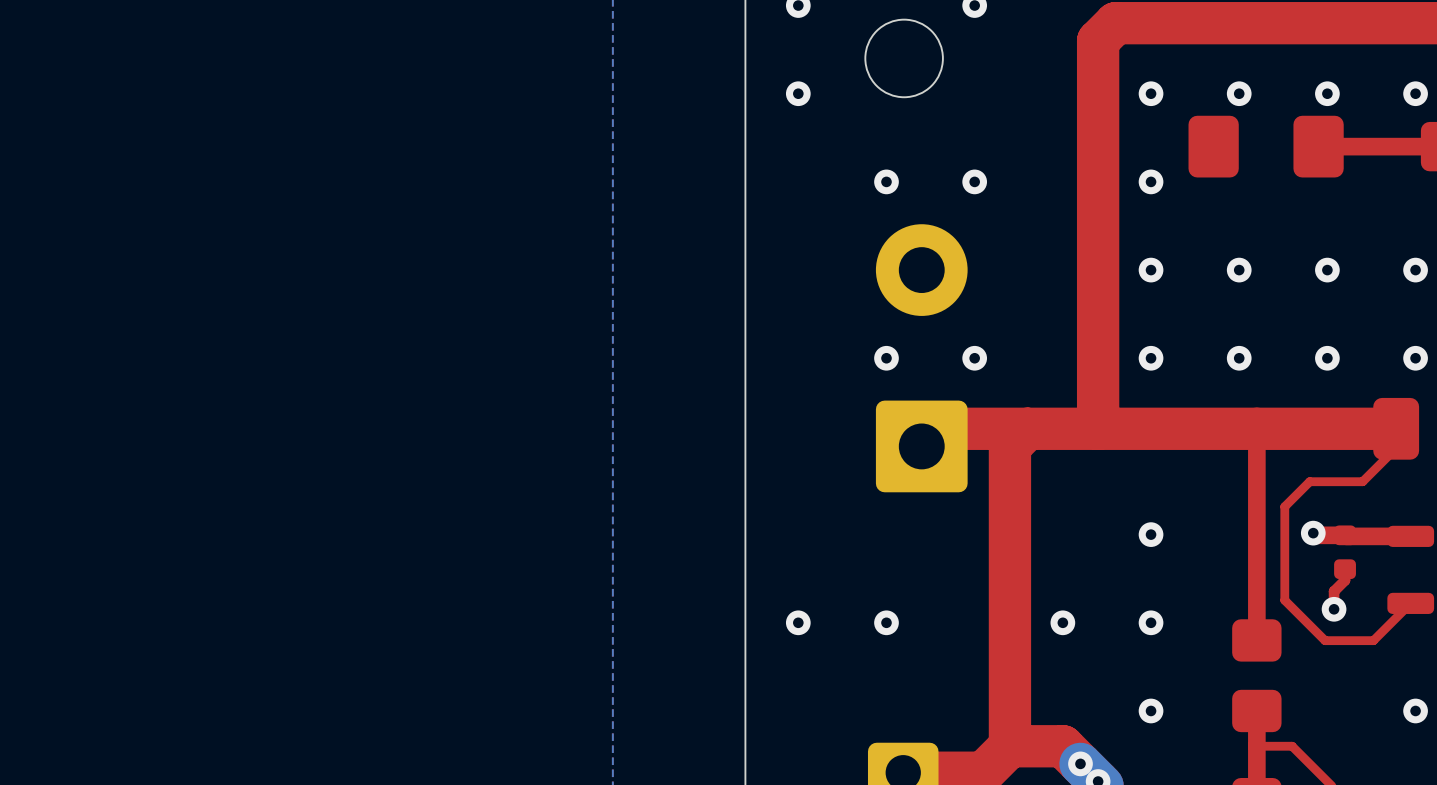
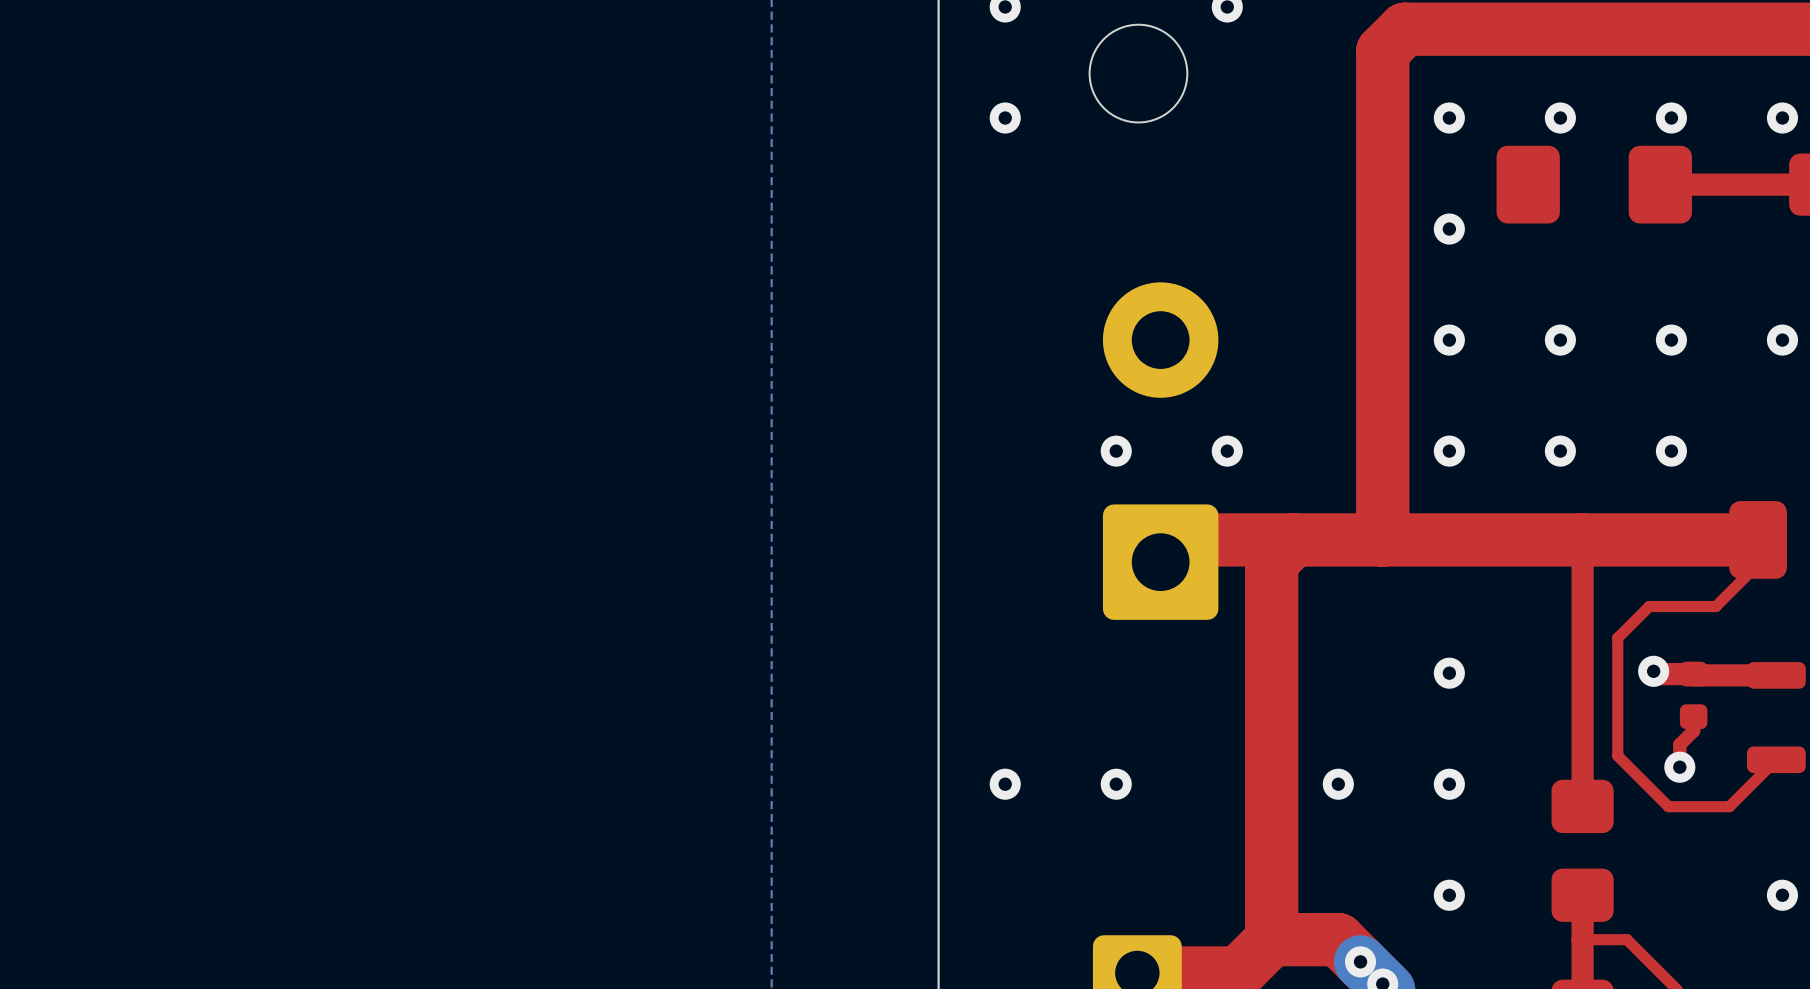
via: (886, 181) -> none
via: (974, 181) -> none
via: (1415, 358) -> none

